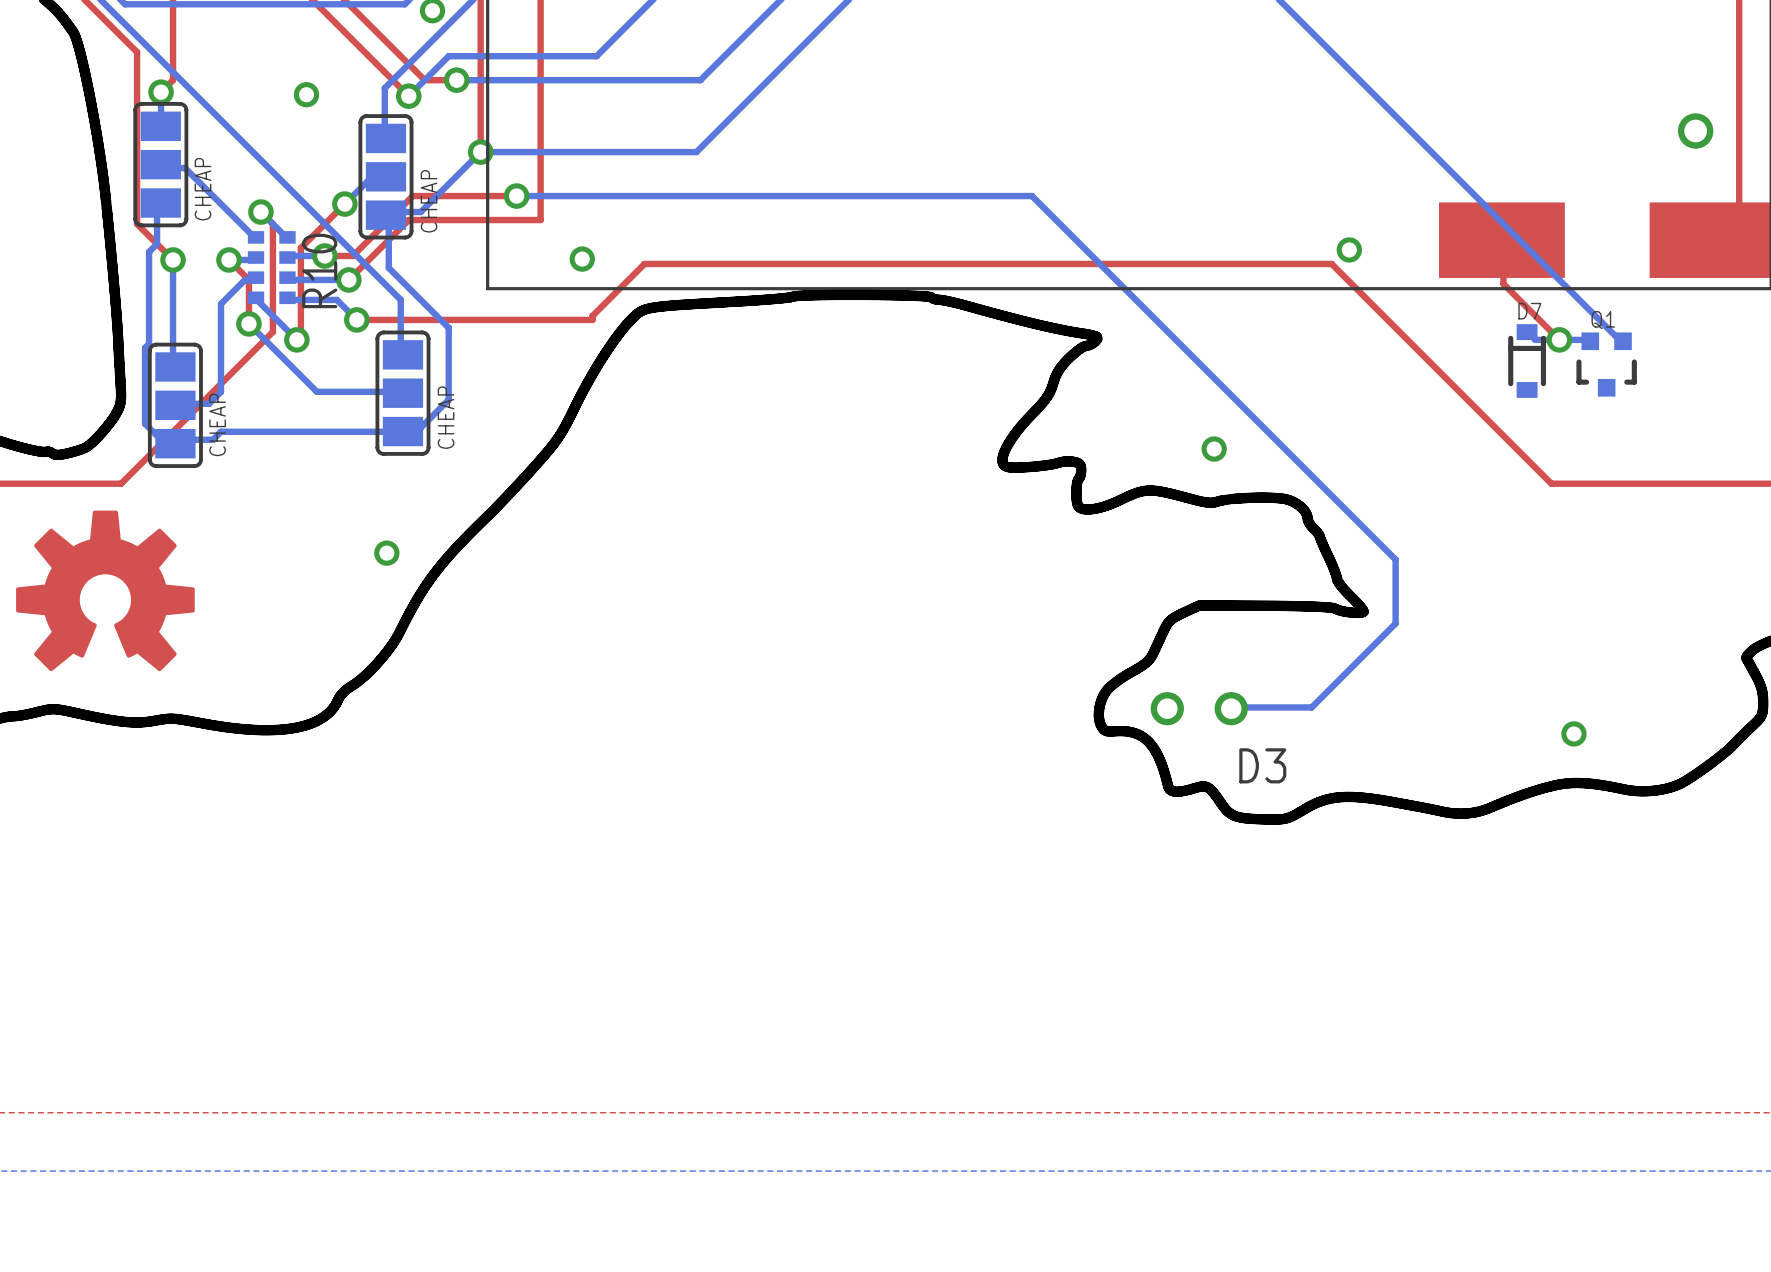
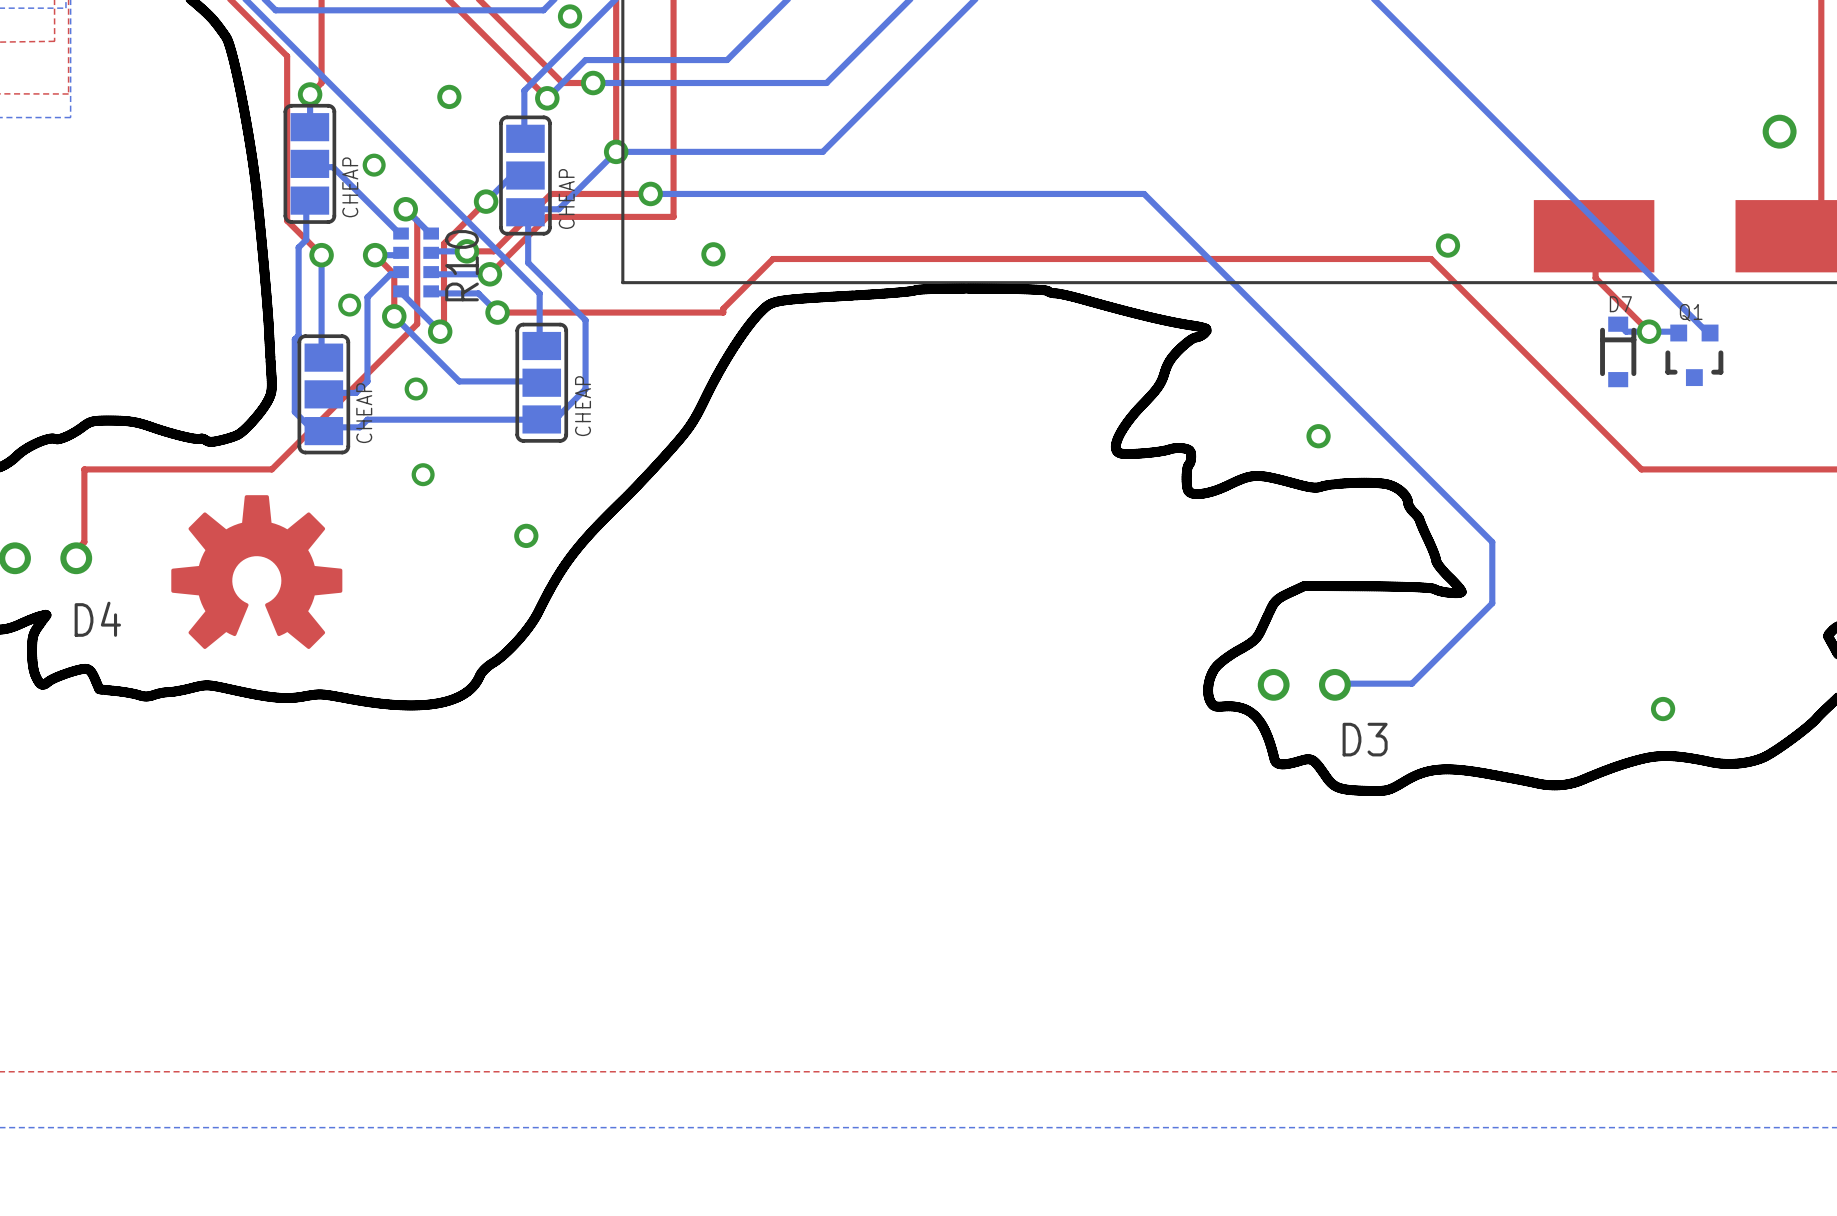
via: none -> (374, 165)
via: none -> (349, 305)
via: none -> (416, 388)
via: none -> (423, 474)

